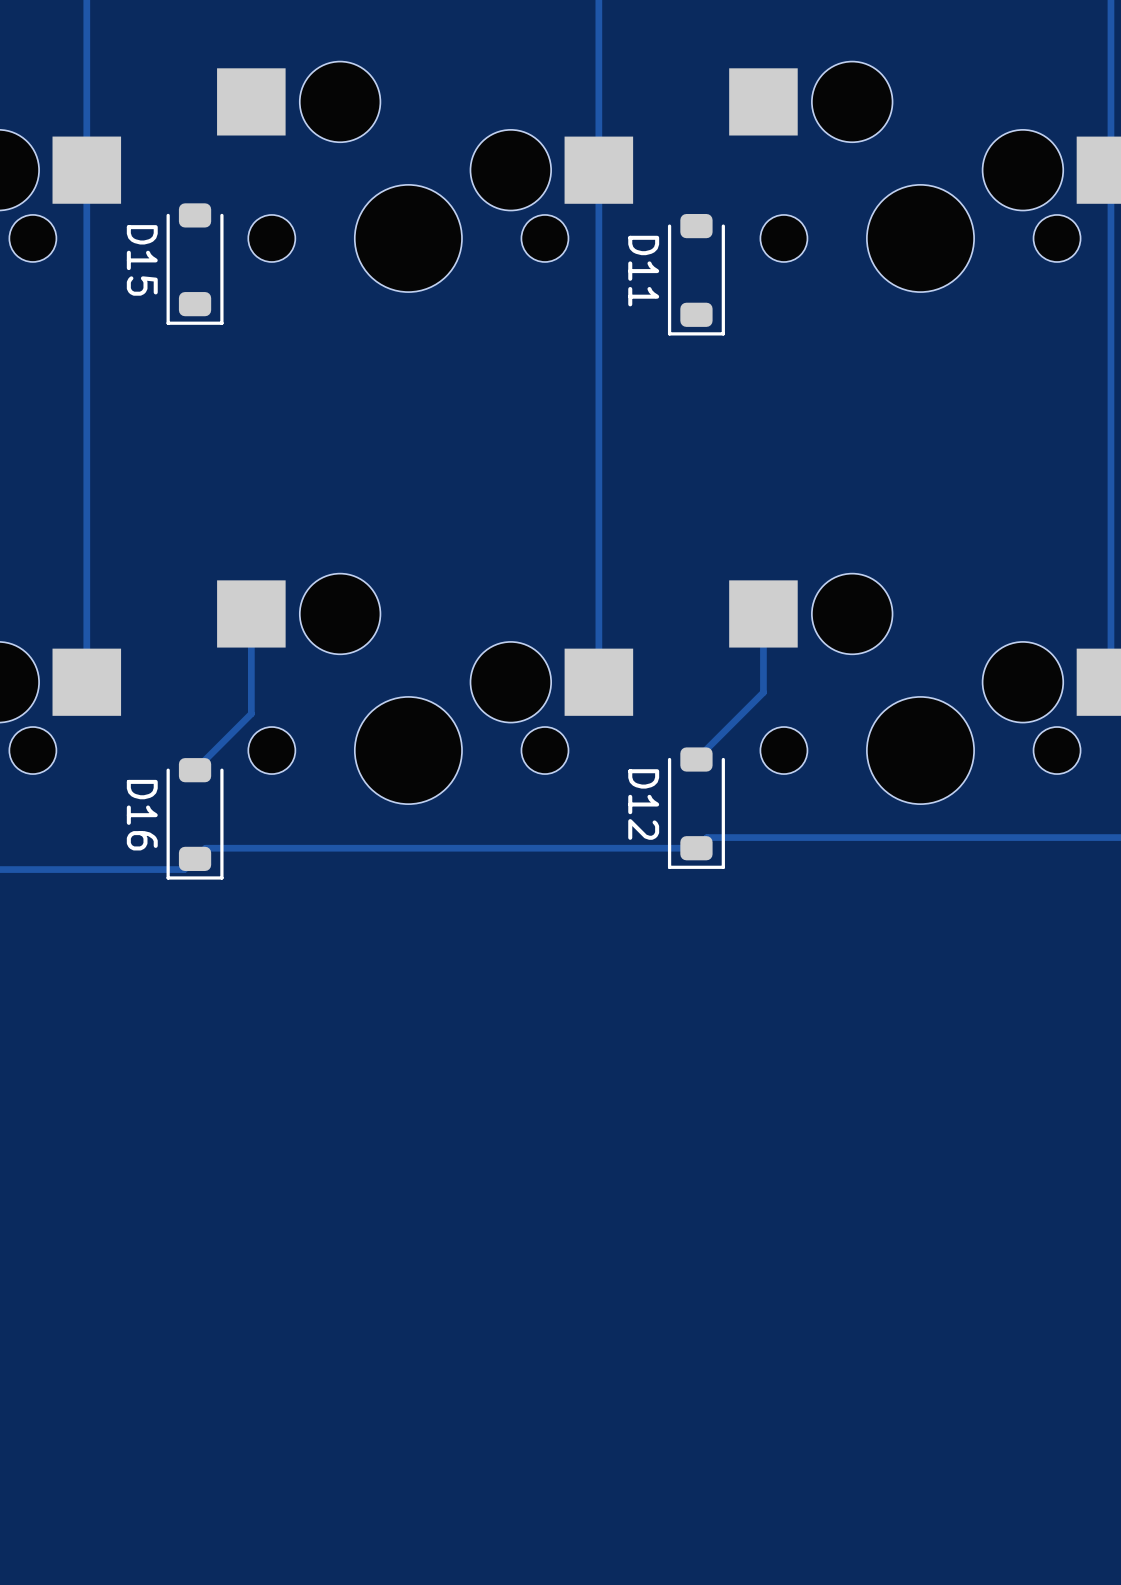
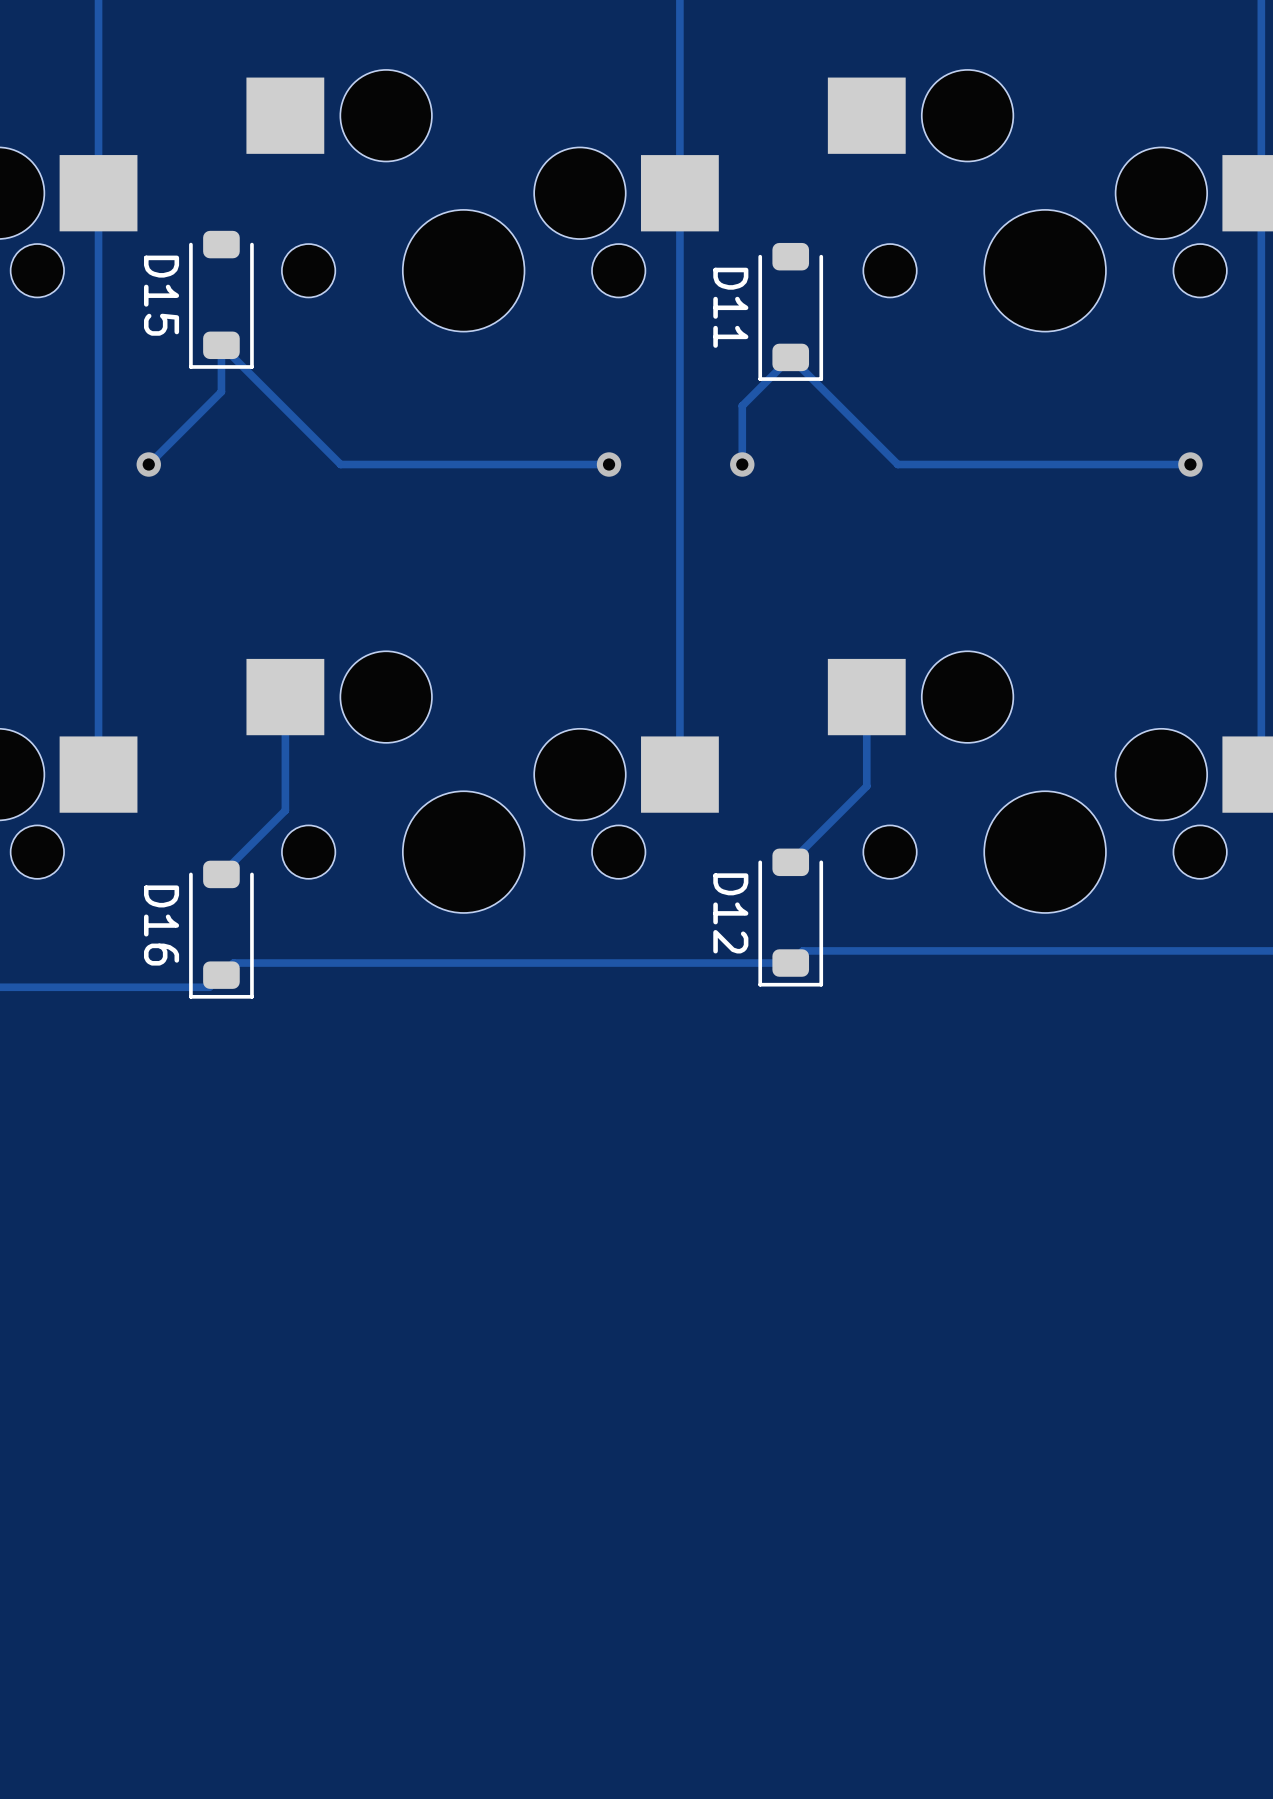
via: none -> (148, 464)
track: none -> (609, 464) (340, 464) (221, 345) (221, 391) (148, 464)
via: none -> (609, 464)
via: none -> (742, 464)
track: none -> (1190, 464) (897, 464) (790, 357) (742, 405) (742, 464)
via: none -> (1190, 464)

